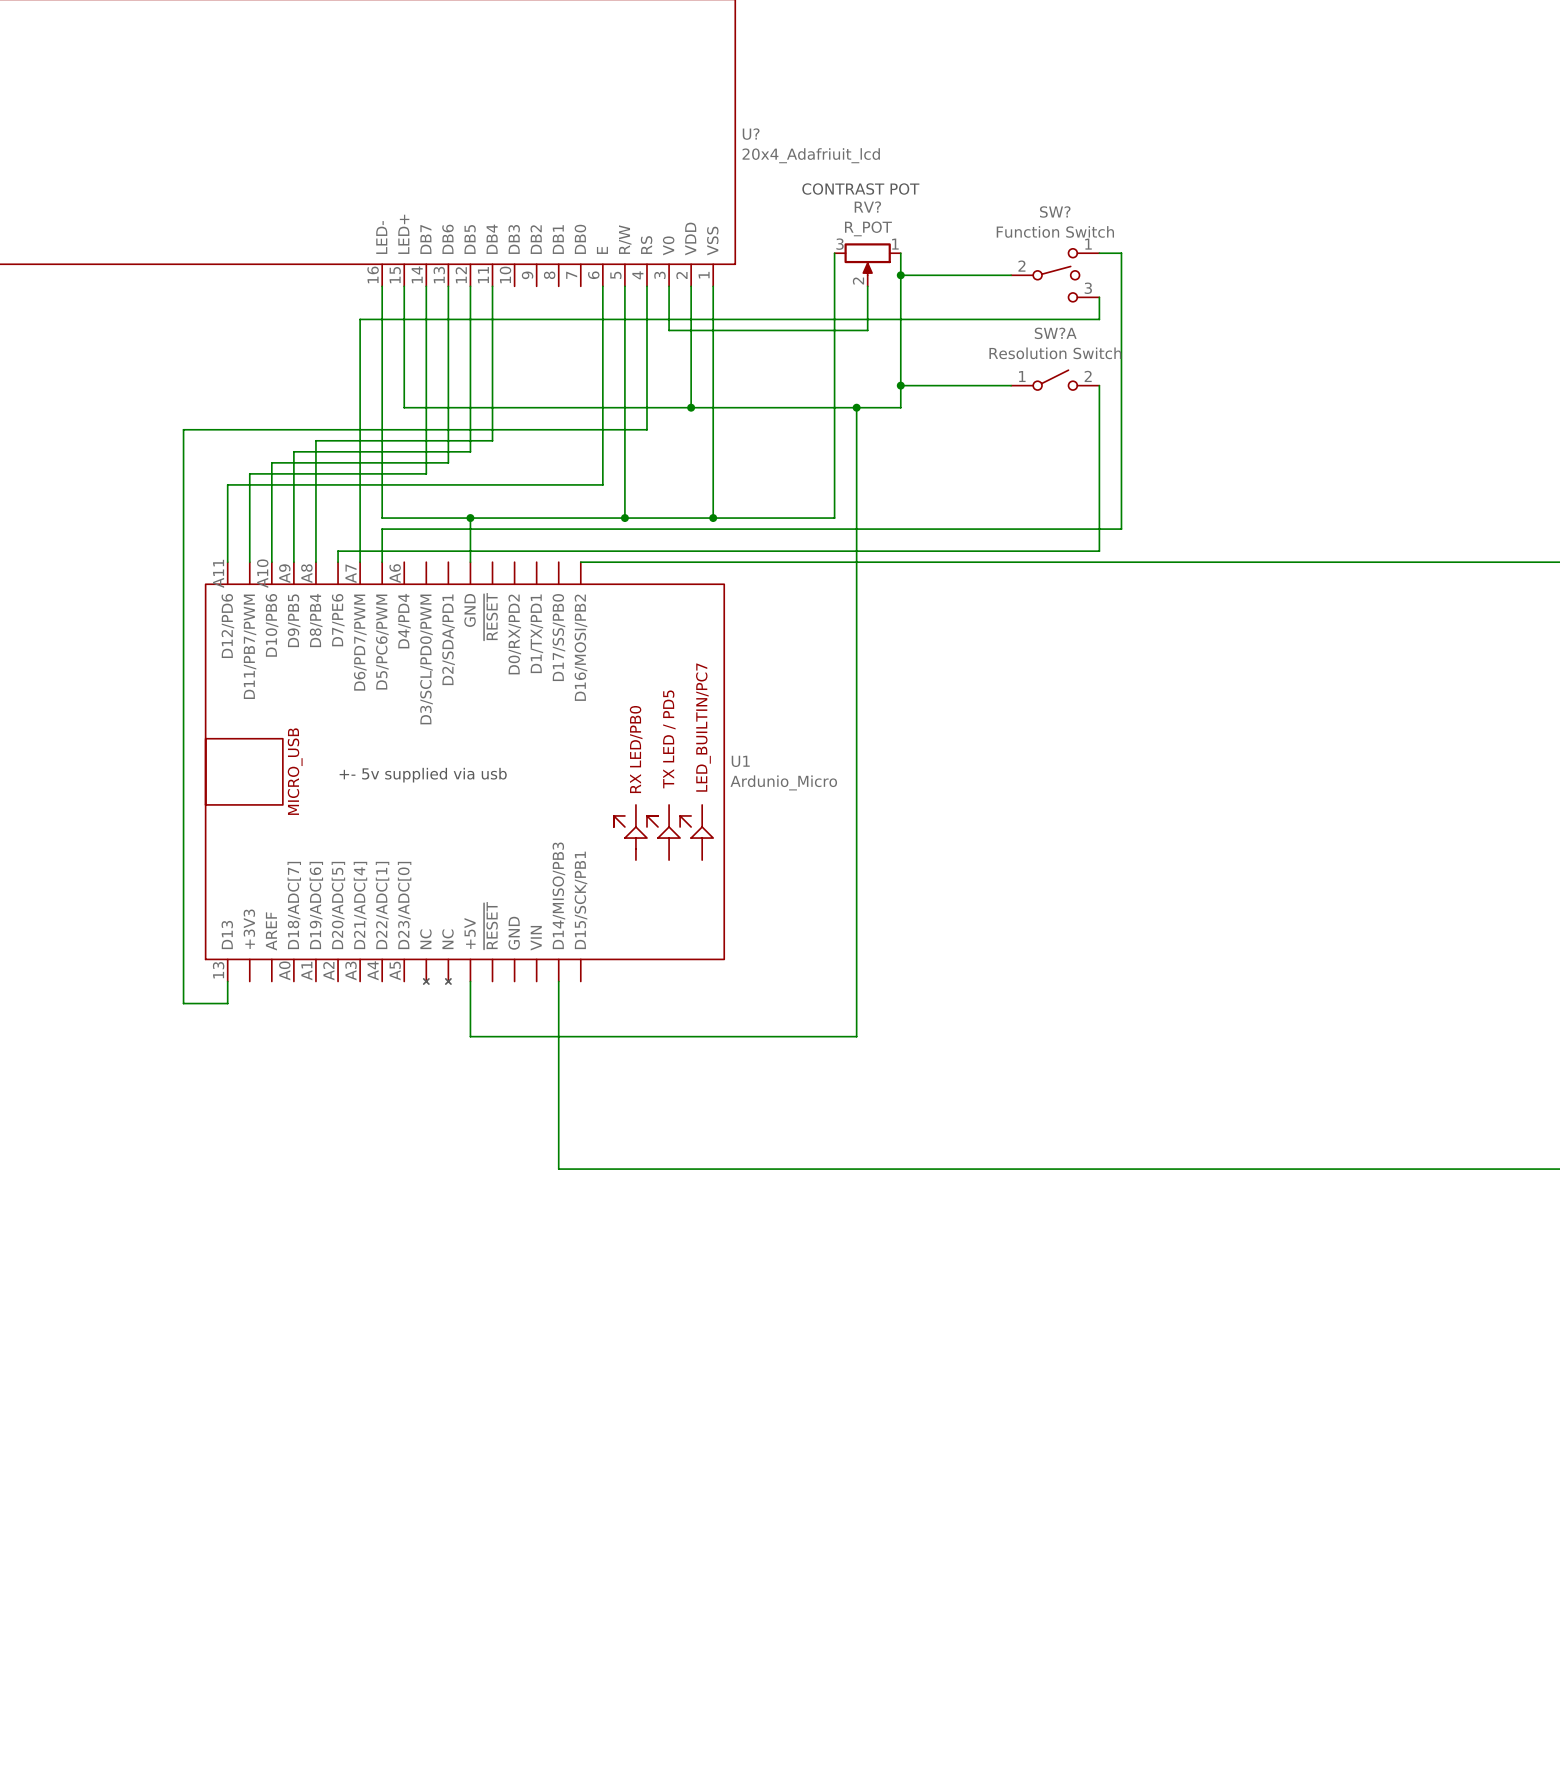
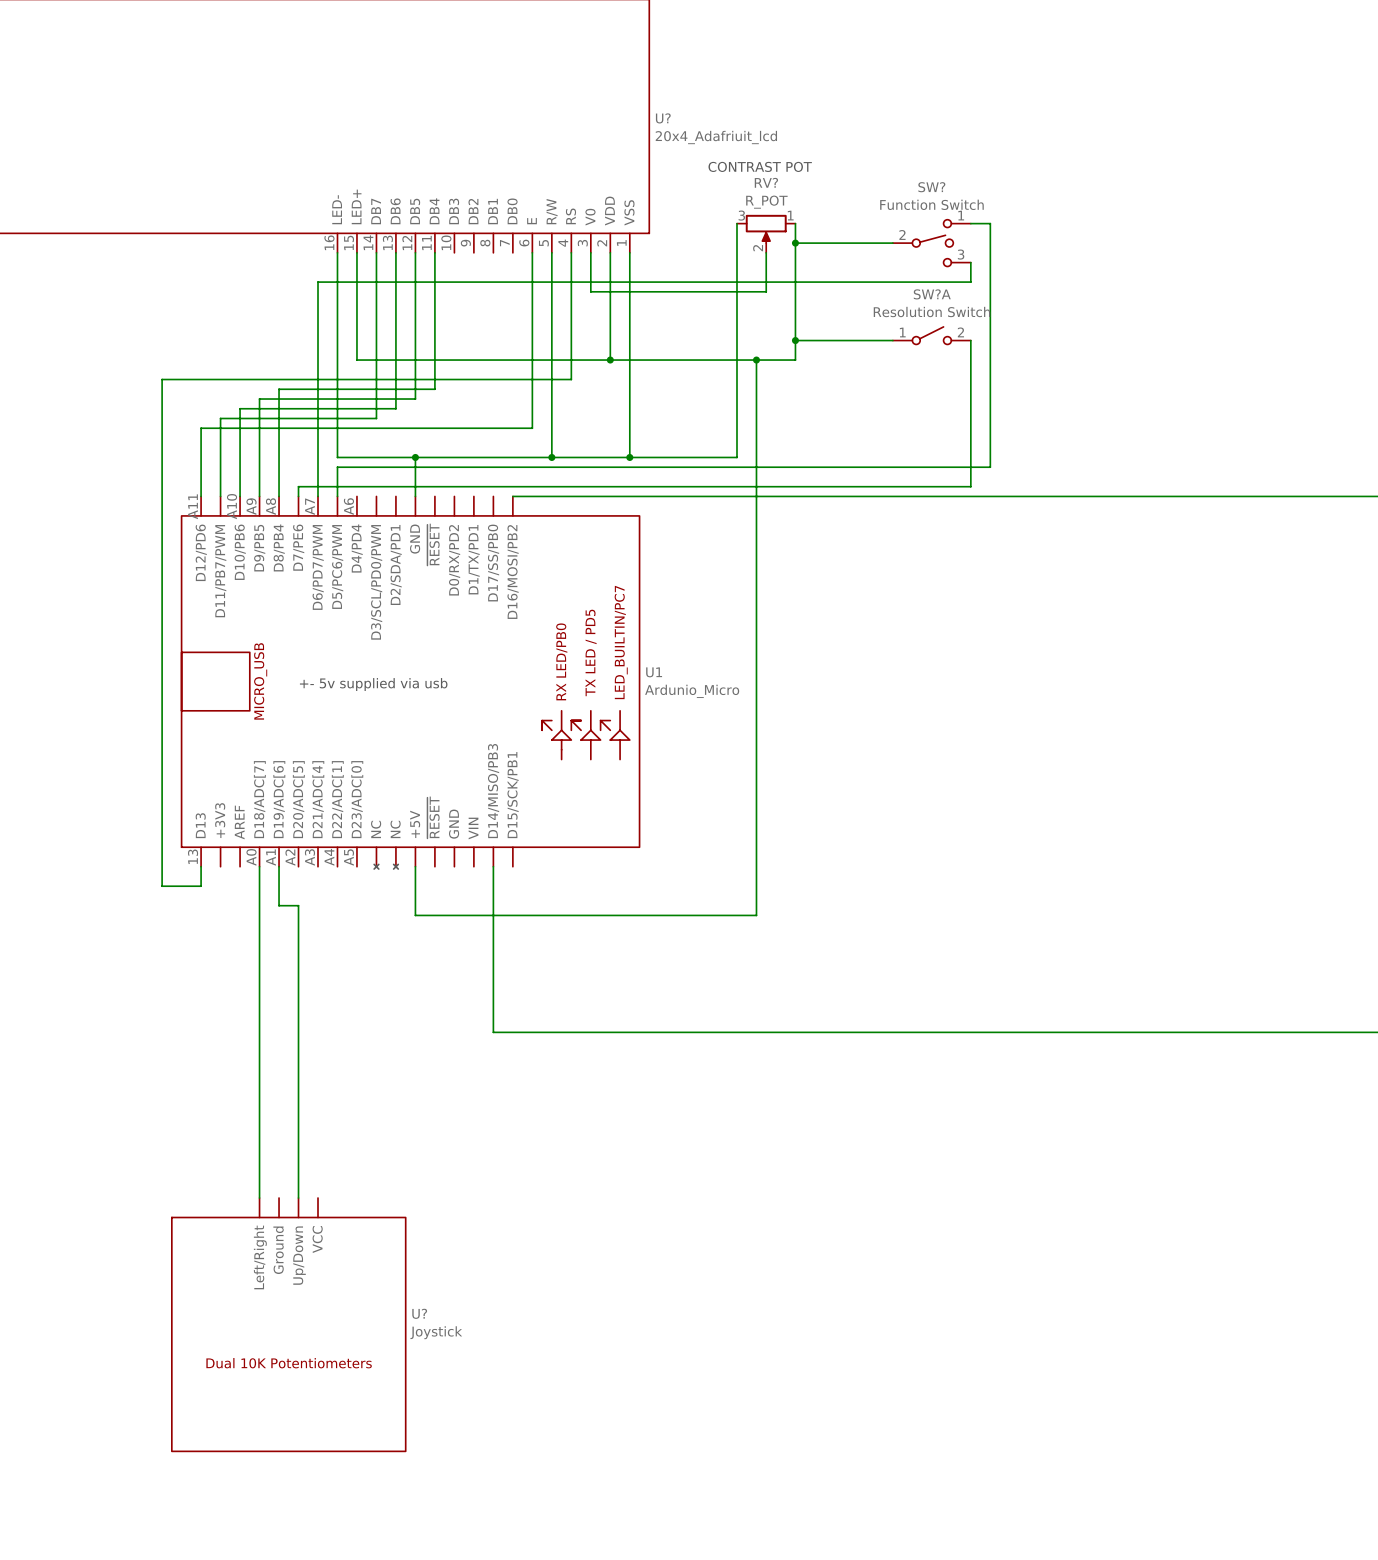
wire: none -> (259, 866) (259, 1198)
wire: none -> (279, 866) (279, 905) (298, 905) (298, 1198)
U?: none -> Joystick (288, 1324)

